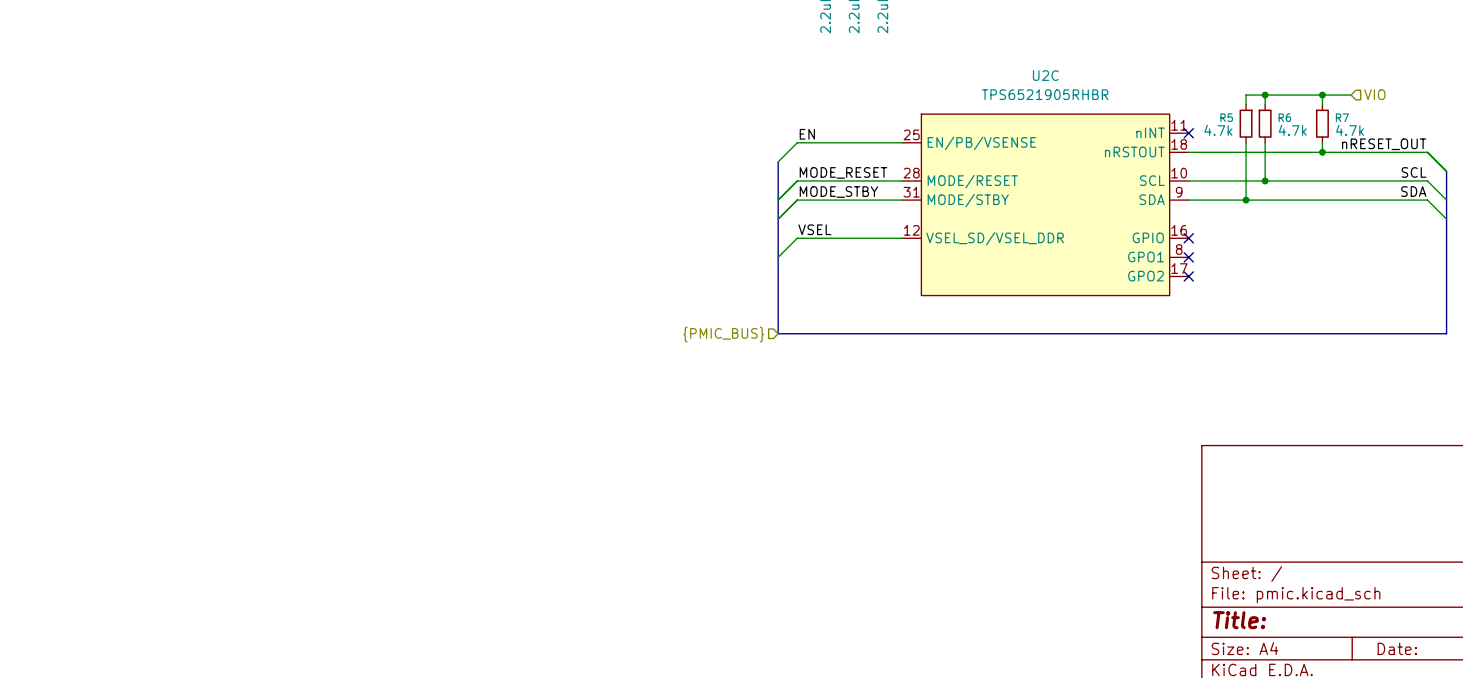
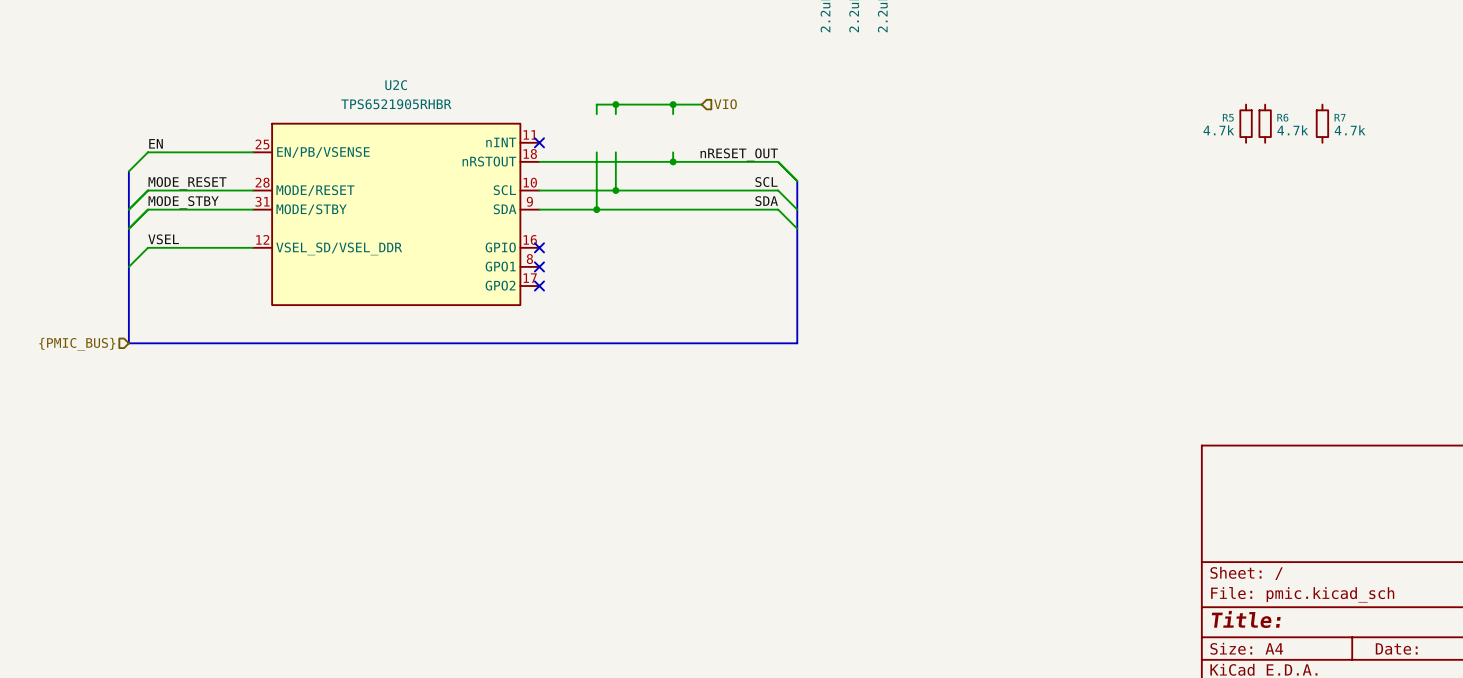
hierarchical label: VIO (1374, 94) -> none
wire: (1265, 95) (1265, 104) -> none
junction: (1265, 95) -> none
wire: (1322, 95) (1322, 104) -> none
junction: (1322, 95) -> none
wire: (1351, 95) (1246, 95) (1246, 104) -> none
wire: none -> (615, 104) (615, 114)
junction: none -> (615, 104)
wire: none -> (673, 104) (673, 114)
junction: none -> (673, 104)
wire: none -> (701, 104) (596, 104) (596, 114)
hierarchical label: none -> VIO (725, 104)
no-connect mark: (1188, 133) -> none
label: EN (807, 134) -> none
no-connect mark: none -> (539, 142)
wire: (902, 142) (797, 142) (778, 161) -> none
wire: (1246, 142) (1246, 200) -> none
wire: (1265, 142) (1265, 180) -> none
wire: (1322, 142) (1322, 152) -> none
label: none -> EN (156, 143)
label: nRESET_OUT (1384, 144) -> none
wire: none -> (253, 152) (147, 152) (128, 171)
wire: none -> (596, 152) (596, 209)
wire: none -> (615, 152) (615, 190)
wire: none -> (673, 152) (673, 161)
wire: (1188, 152) (1427, 152) (1446, 171) -> none
junction: (1322, 152) -> none
label: none -> nRESET_OUT (739, 154)
wire: none -> (539, 161) (778, 161) (797, 180)
junction: none -> (673, 161)
bus: (778, 161) (778, 333) (1446, 333) (1446, 171) -> none
bus: none -> (128, 171) (128, 343) (797, 343) (797, 180)
label: MODE_RESET (843, 172) -> none
label: SCL (1413, 172) -> none
wire: (902, 180) (797, 180) (778, 200) -> none
wire: (1188, 180) (1427, 180) (1446, 200) -> none
junction: (1265, 180) -> none
label: none -> MODE_RESET (187, 183)
label: none -> SCL (766, 182)
wire: none -> (253, 190) (147, 190) (128, 209)
wire: none -> (539, 190) (778, 190) (797, 209)
junction: none -> (615, 190)
label: SDA (1413, 191) -> none
label: MODE_STBY (838, 192) -> none
wire: (902, 200) (797, 200) (778, 219) -> none
wire: (1188, 200) (1427, 200) (1446, 219) -> none
junction: (1246, 200) -> none
label: none -> MODE_STBY (183, 202)
label: none -> SDA (766, 201)
U2C position: (1045, 204) -> (396, 214)
wire: none -> (253, 209) (147, 209) (128, 228)
wire: none -> (539, 209) (778, 209) (797, 228)
junction: none -> (596, 209)
label: VSEL (814, 229) -> none
wire: (902, 238) (797, 238) (778, 257) -> none
no-connect mark: (1188, 238) -> none
label: none -> VSEL (163, 239)
wire: none -> (253, 247) (147, 247) (128, 266)
no-connect mark: none -> (539, 247)
no-connect mark: (1188, 257) -> none
no-connect mark: none -> (539, 266)
no-connect mark: (1188, 276) -> none
no-connect mark: none -> (539, 286)
hierarchical label: {PMIC_BUS} (723, 334) -> none
hierarchical label: none -> {PMIC_BUS} (77, 344)

